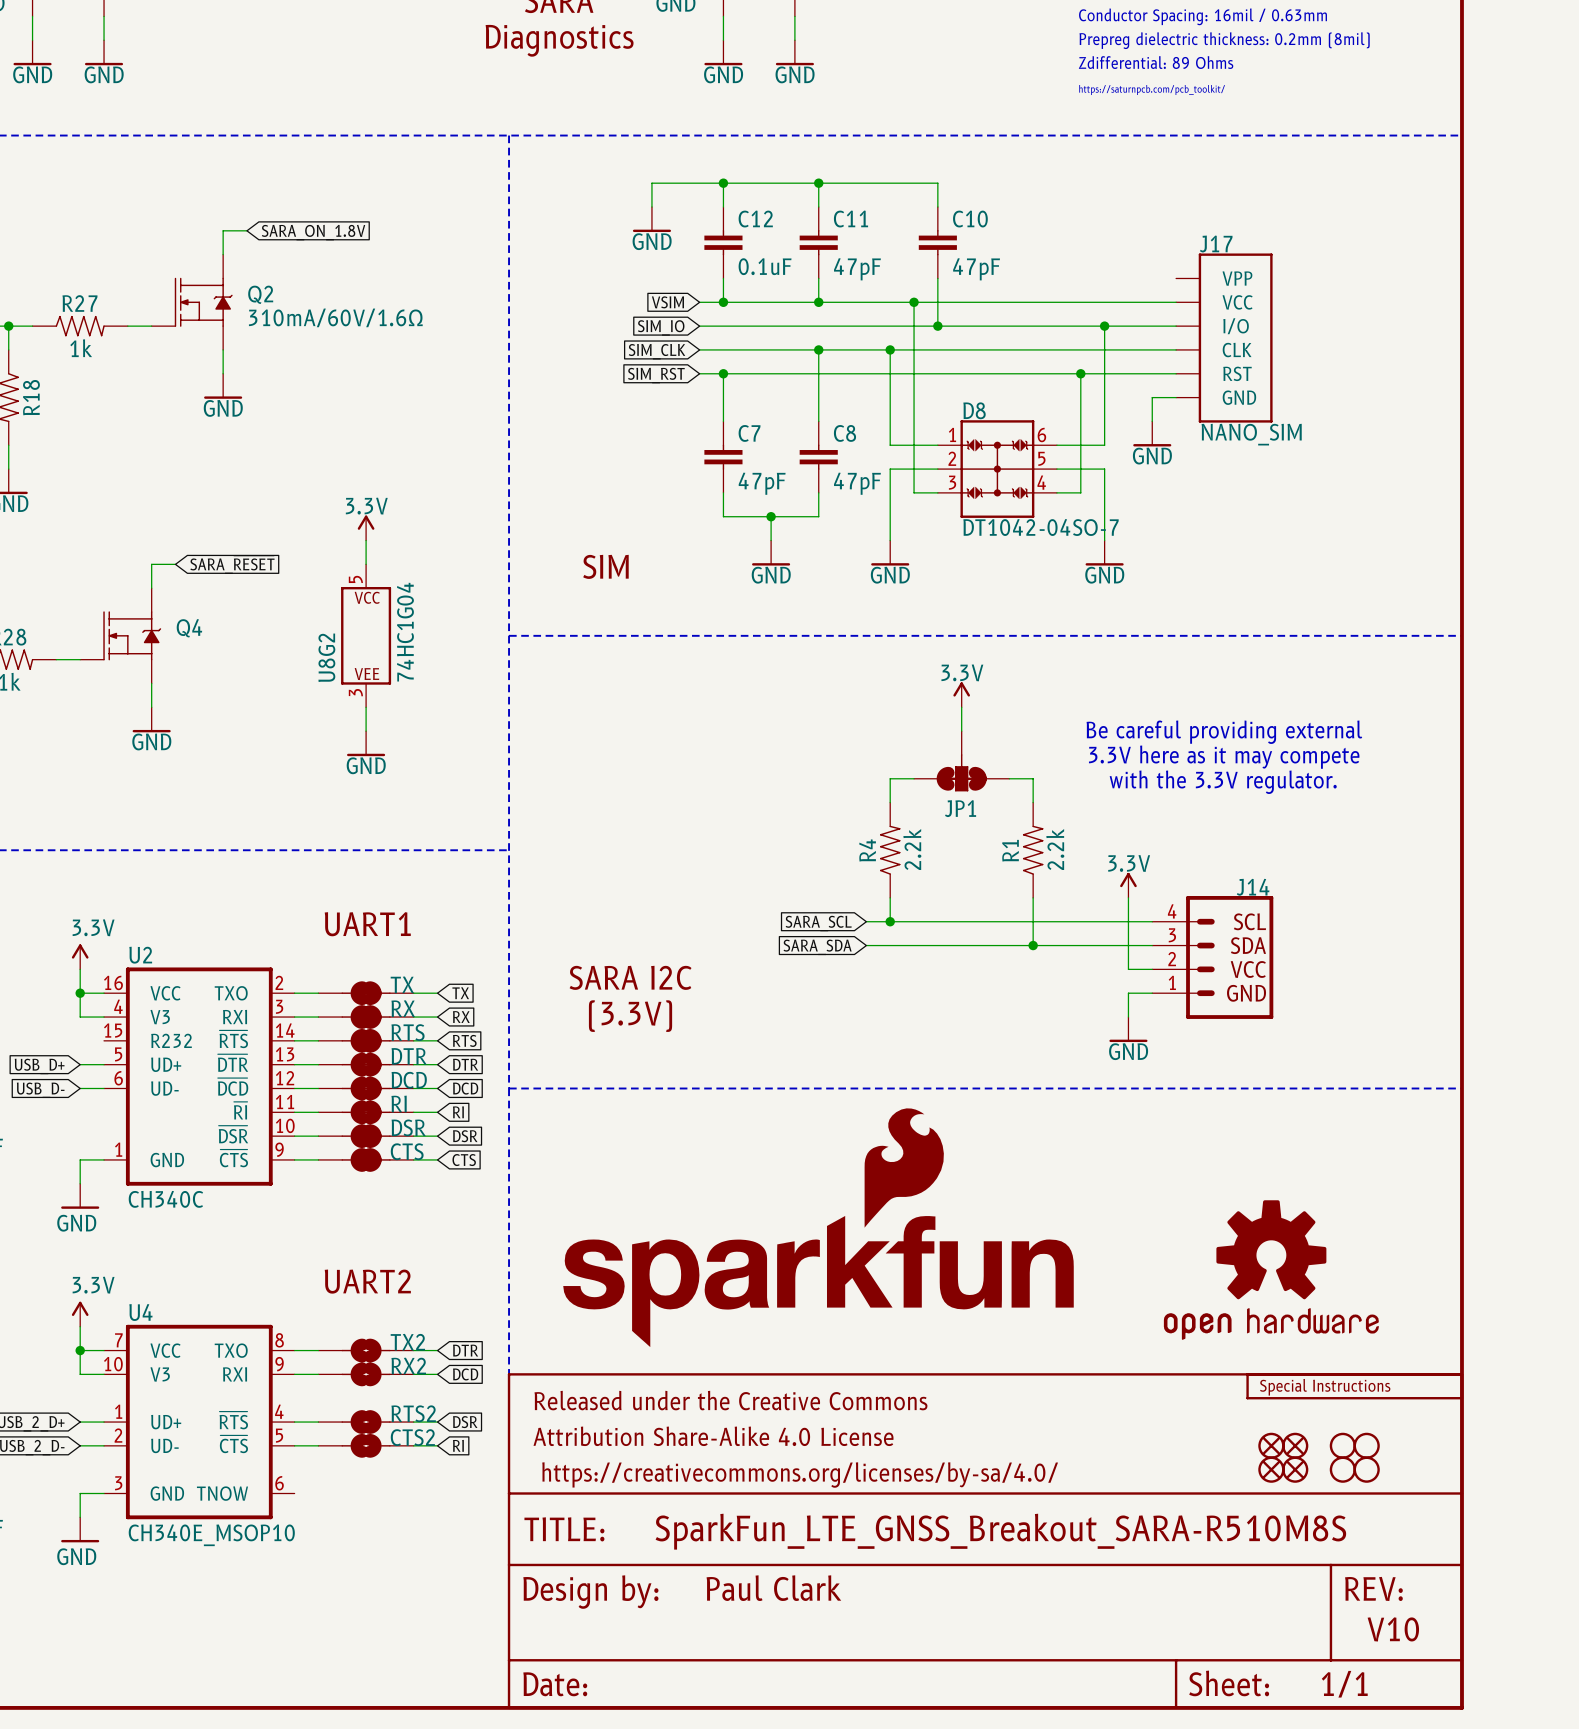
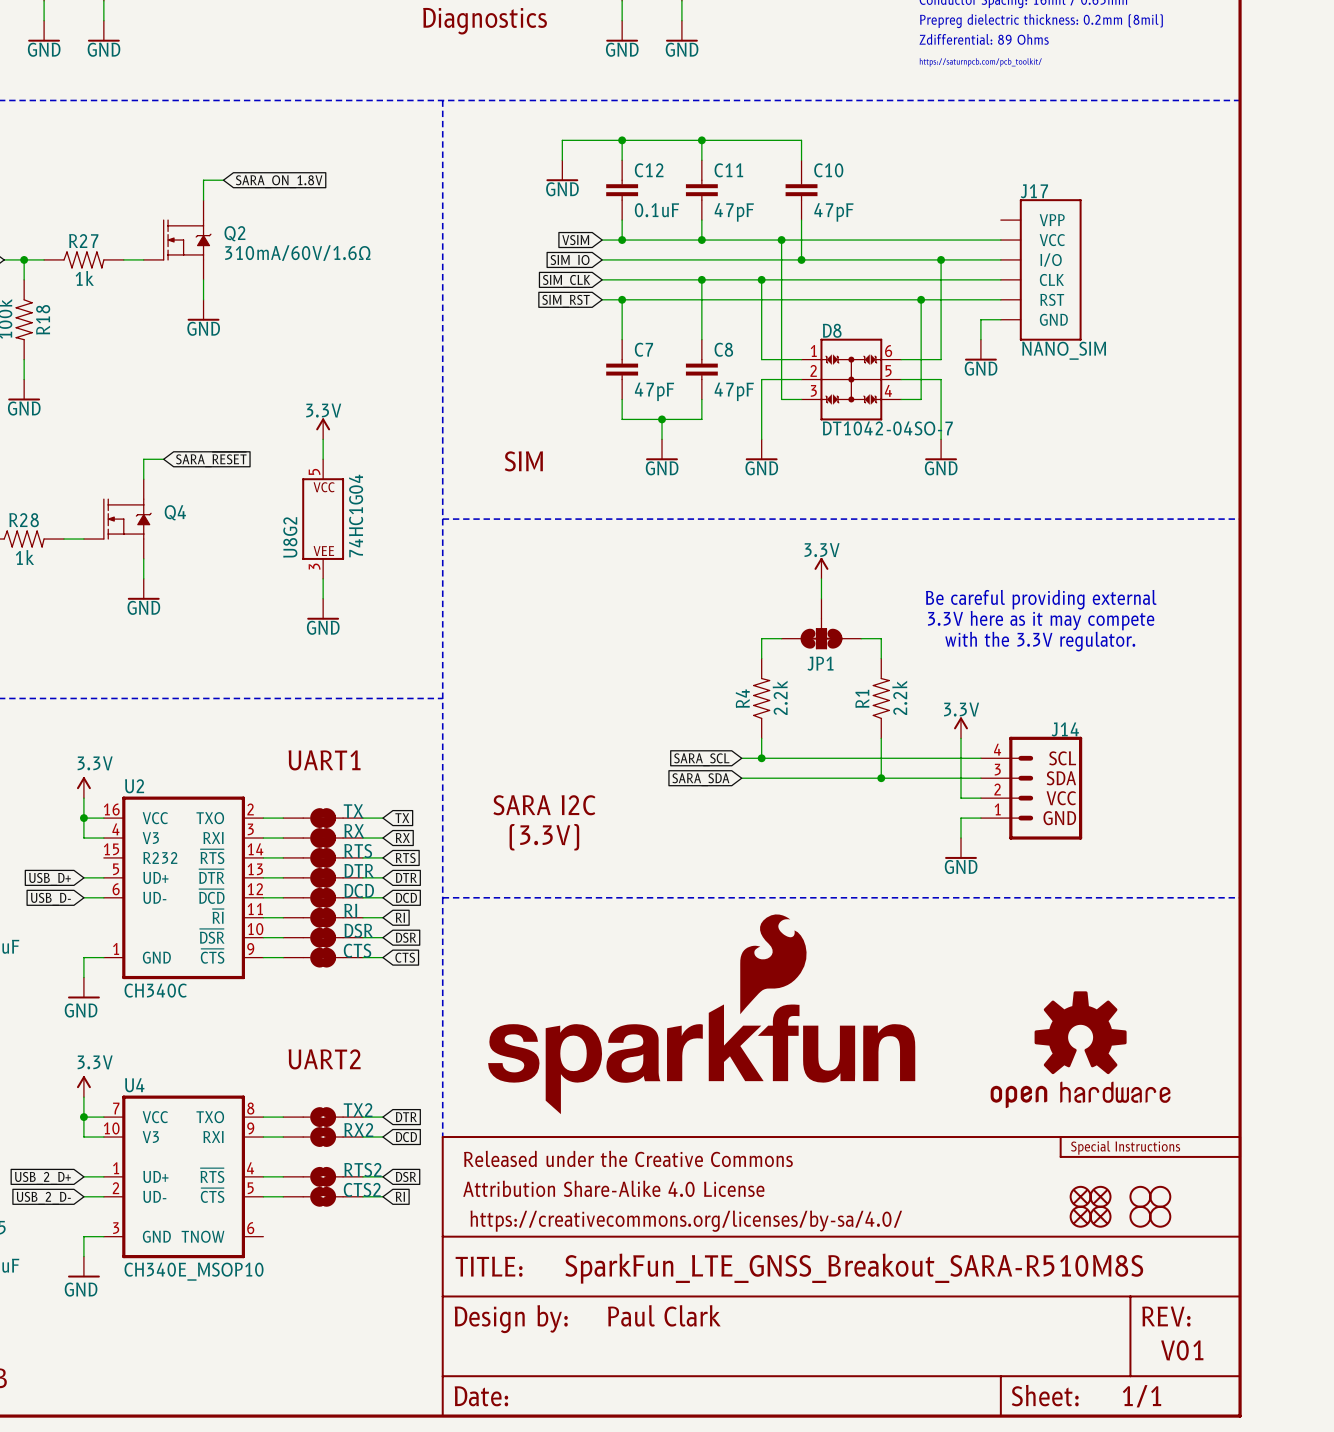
text: V10 (1393, 1629) -> V01 (1182, 1350)

